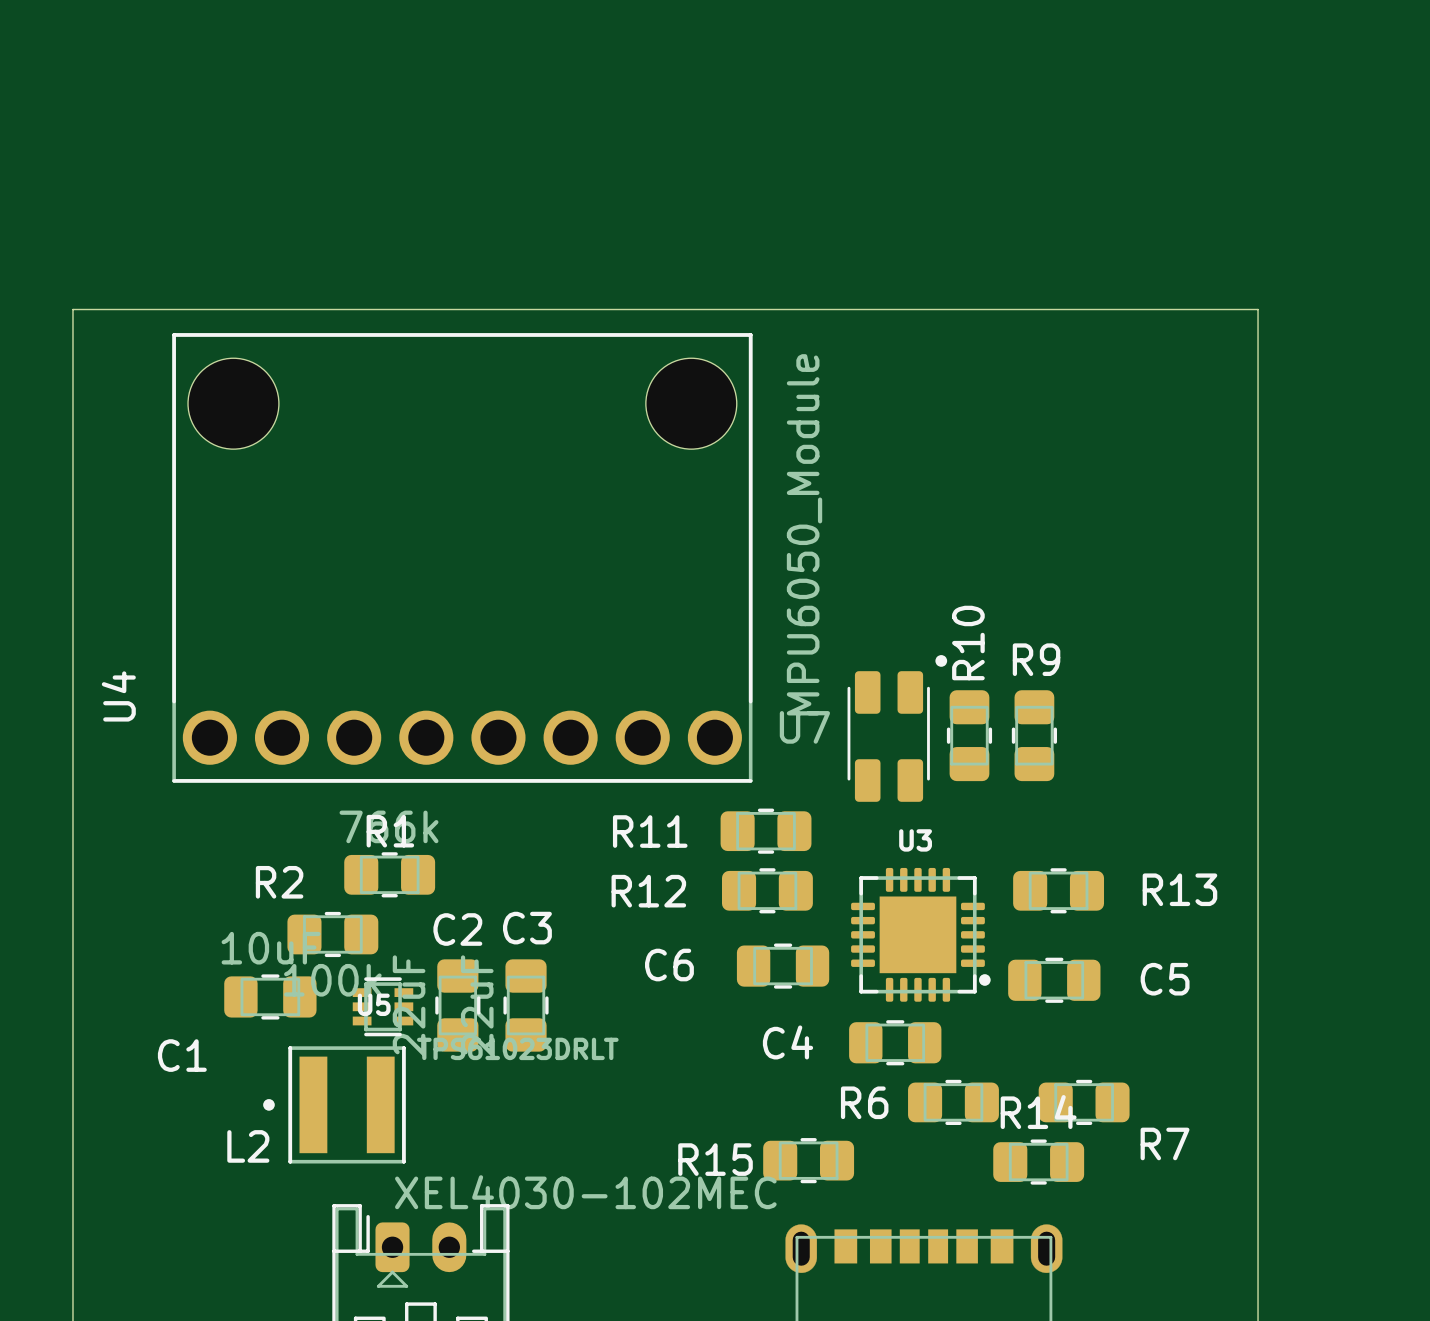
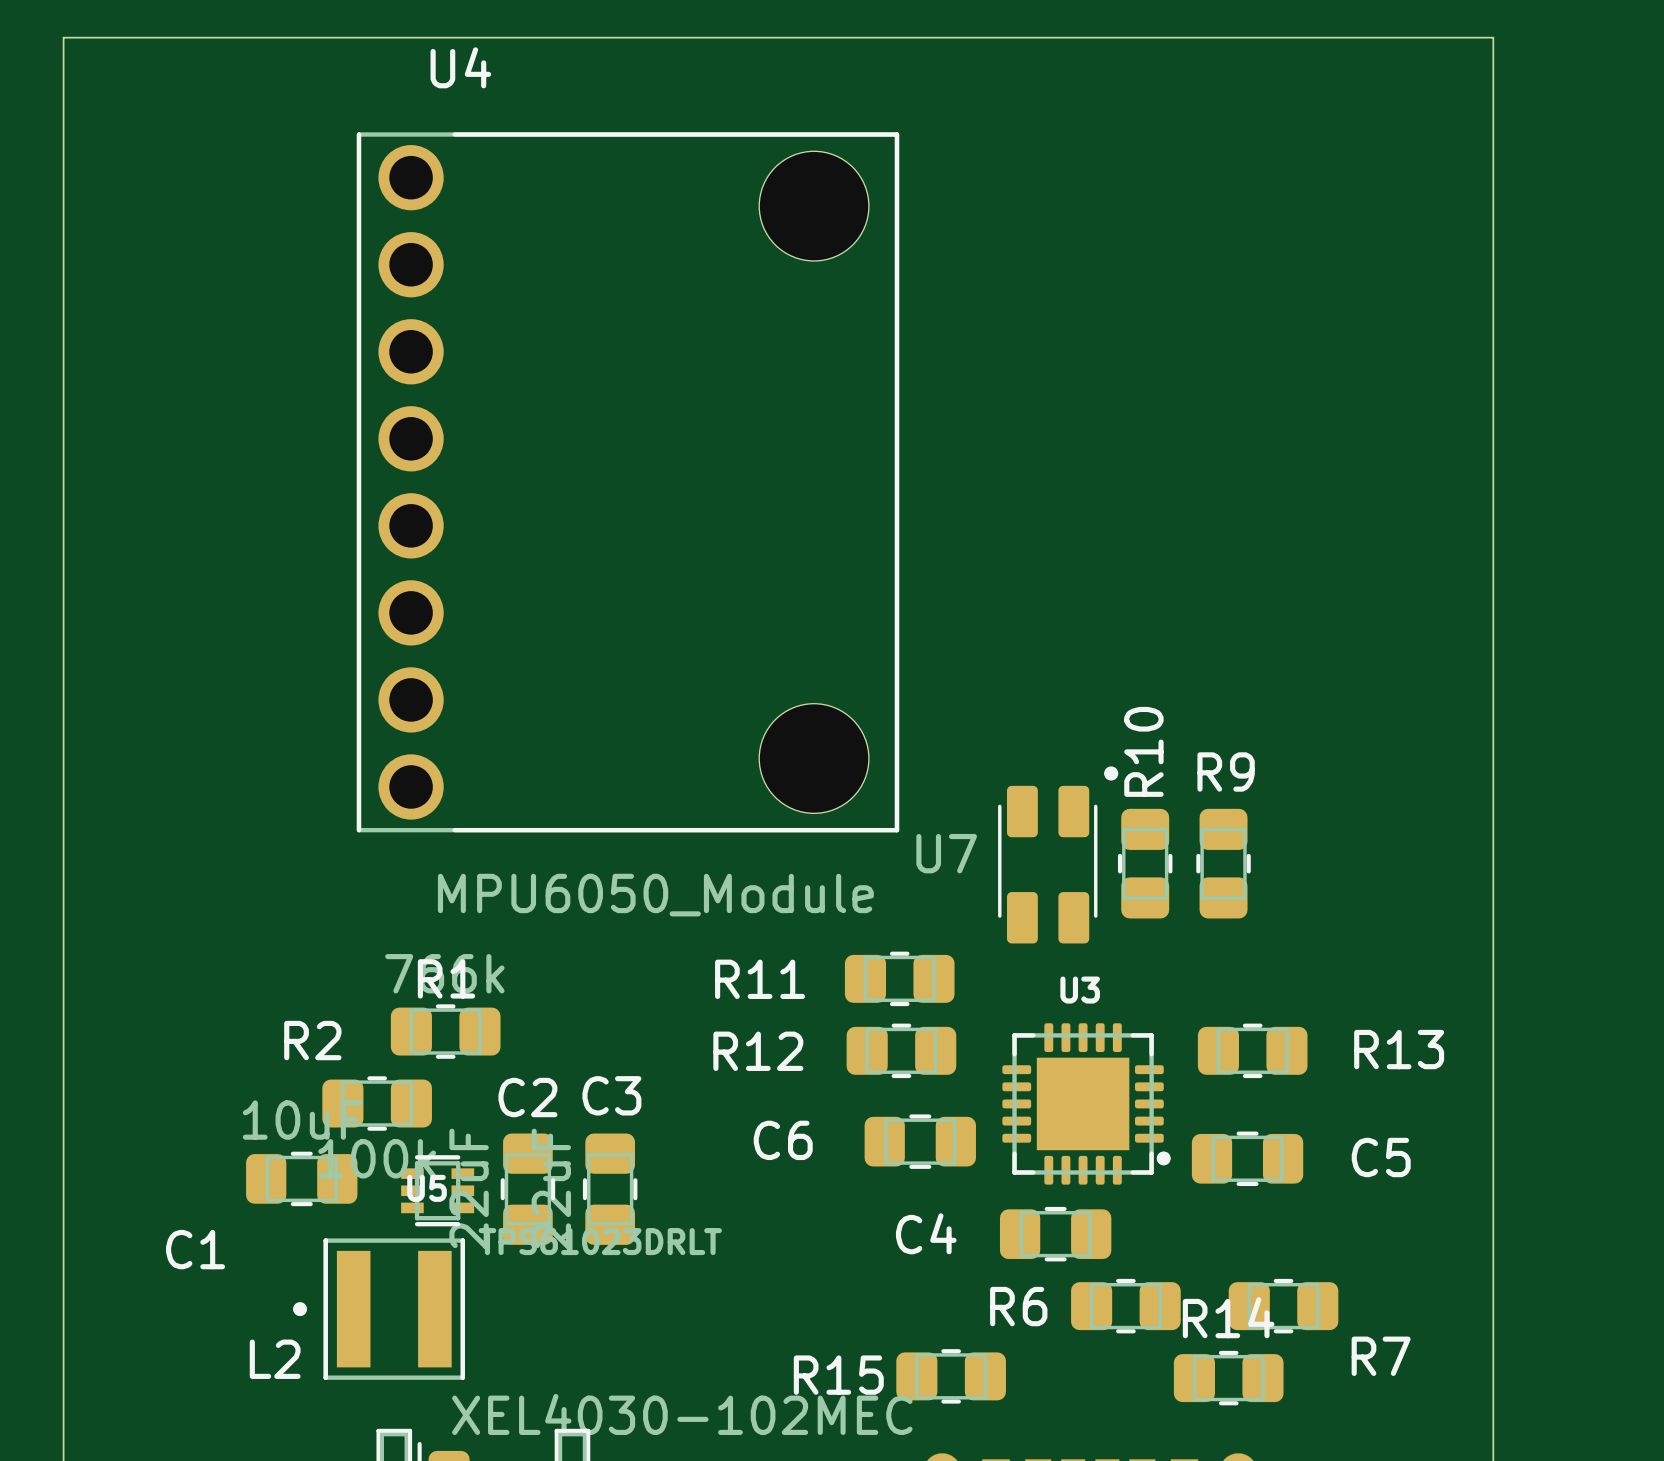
board edge: (72, 309) (1258, 309) -> (63, 349) (63, 37) (1493, 37) (1493, 349)
U4 rotation: 0° (462, 557) -> 90° clockwise (627, 482)

